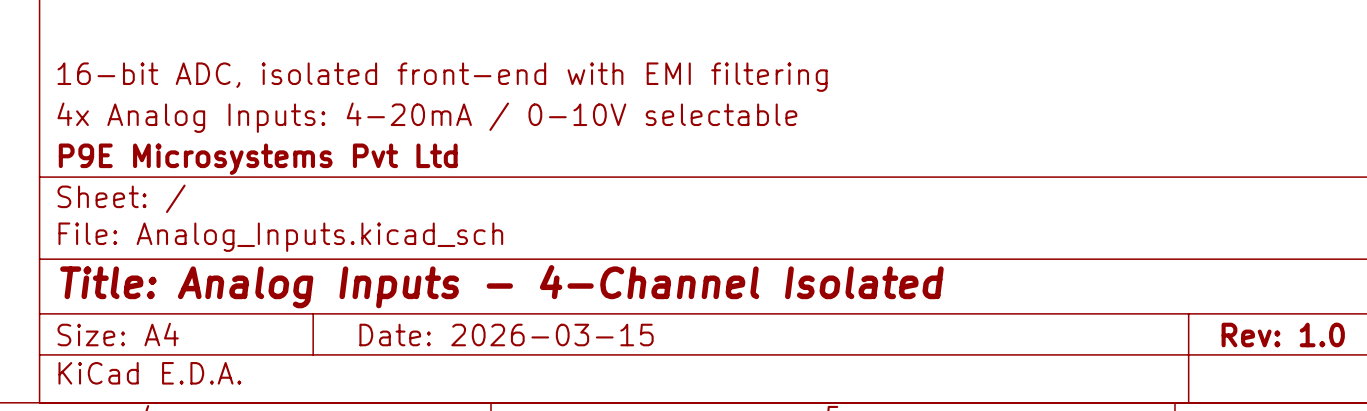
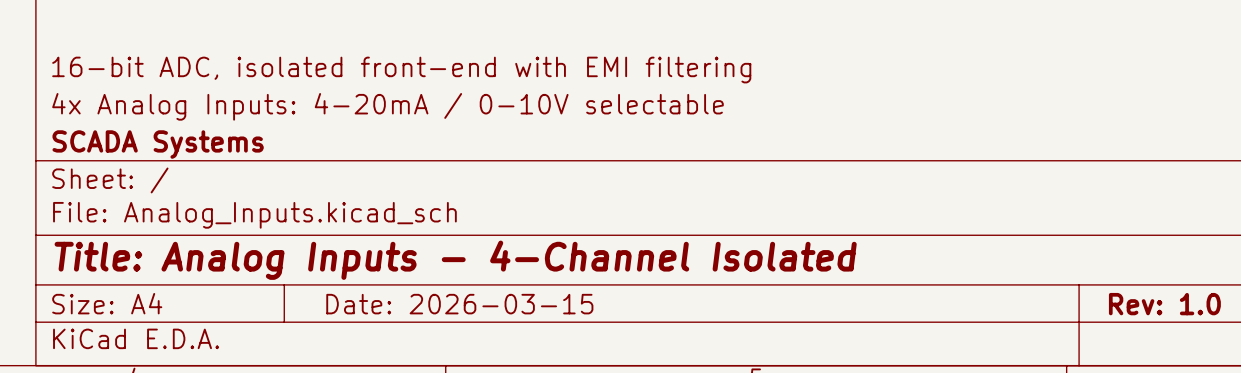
title block: P9E Microsystems Pvt Ltd (258, 159) -> SCADA Systems (158, 144)

